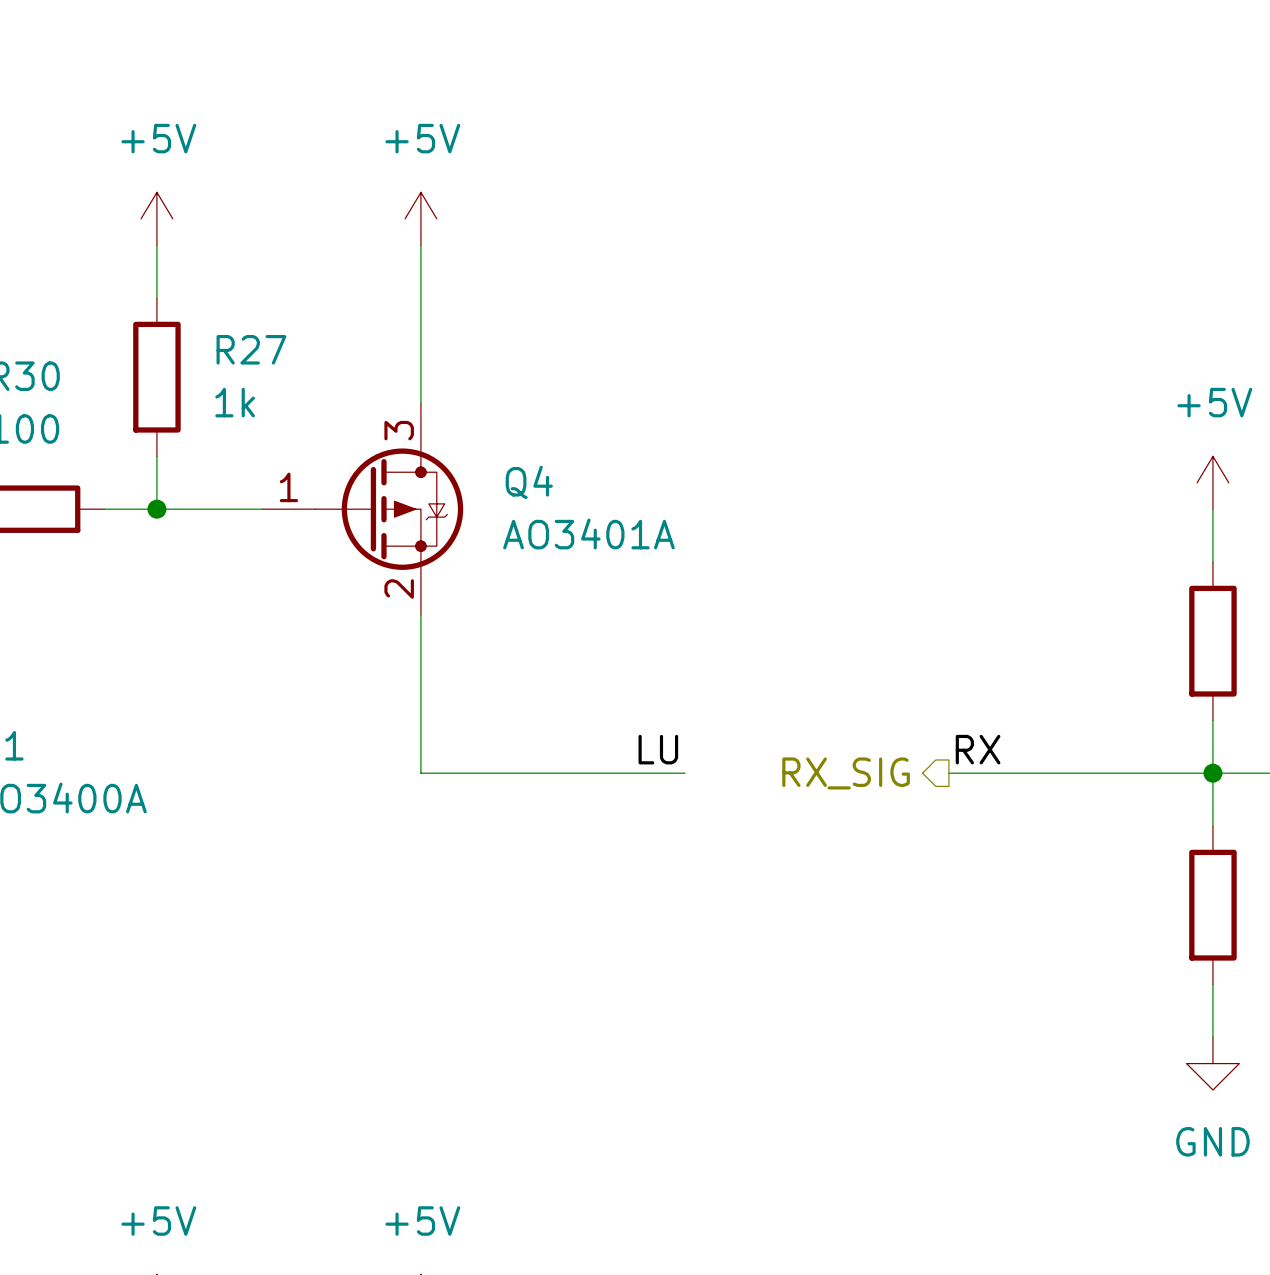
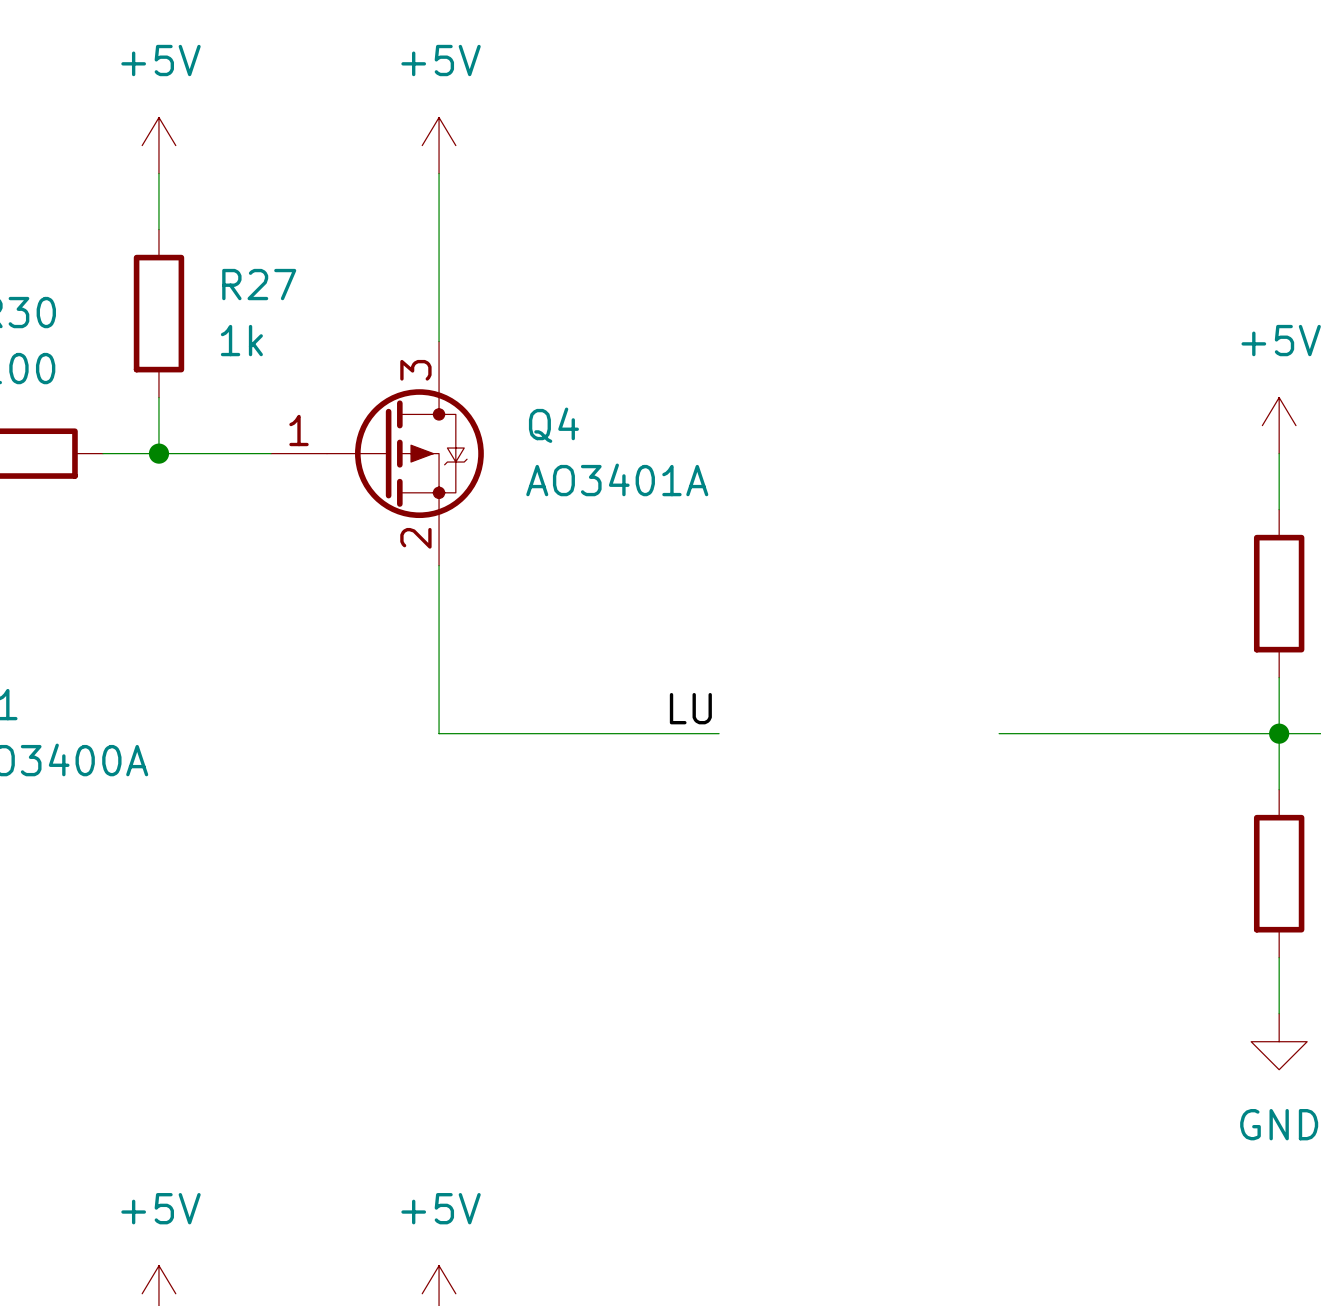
label: RX (978, 749) -> none
hierarchical label: RX_SIG (846, 773) -> none

